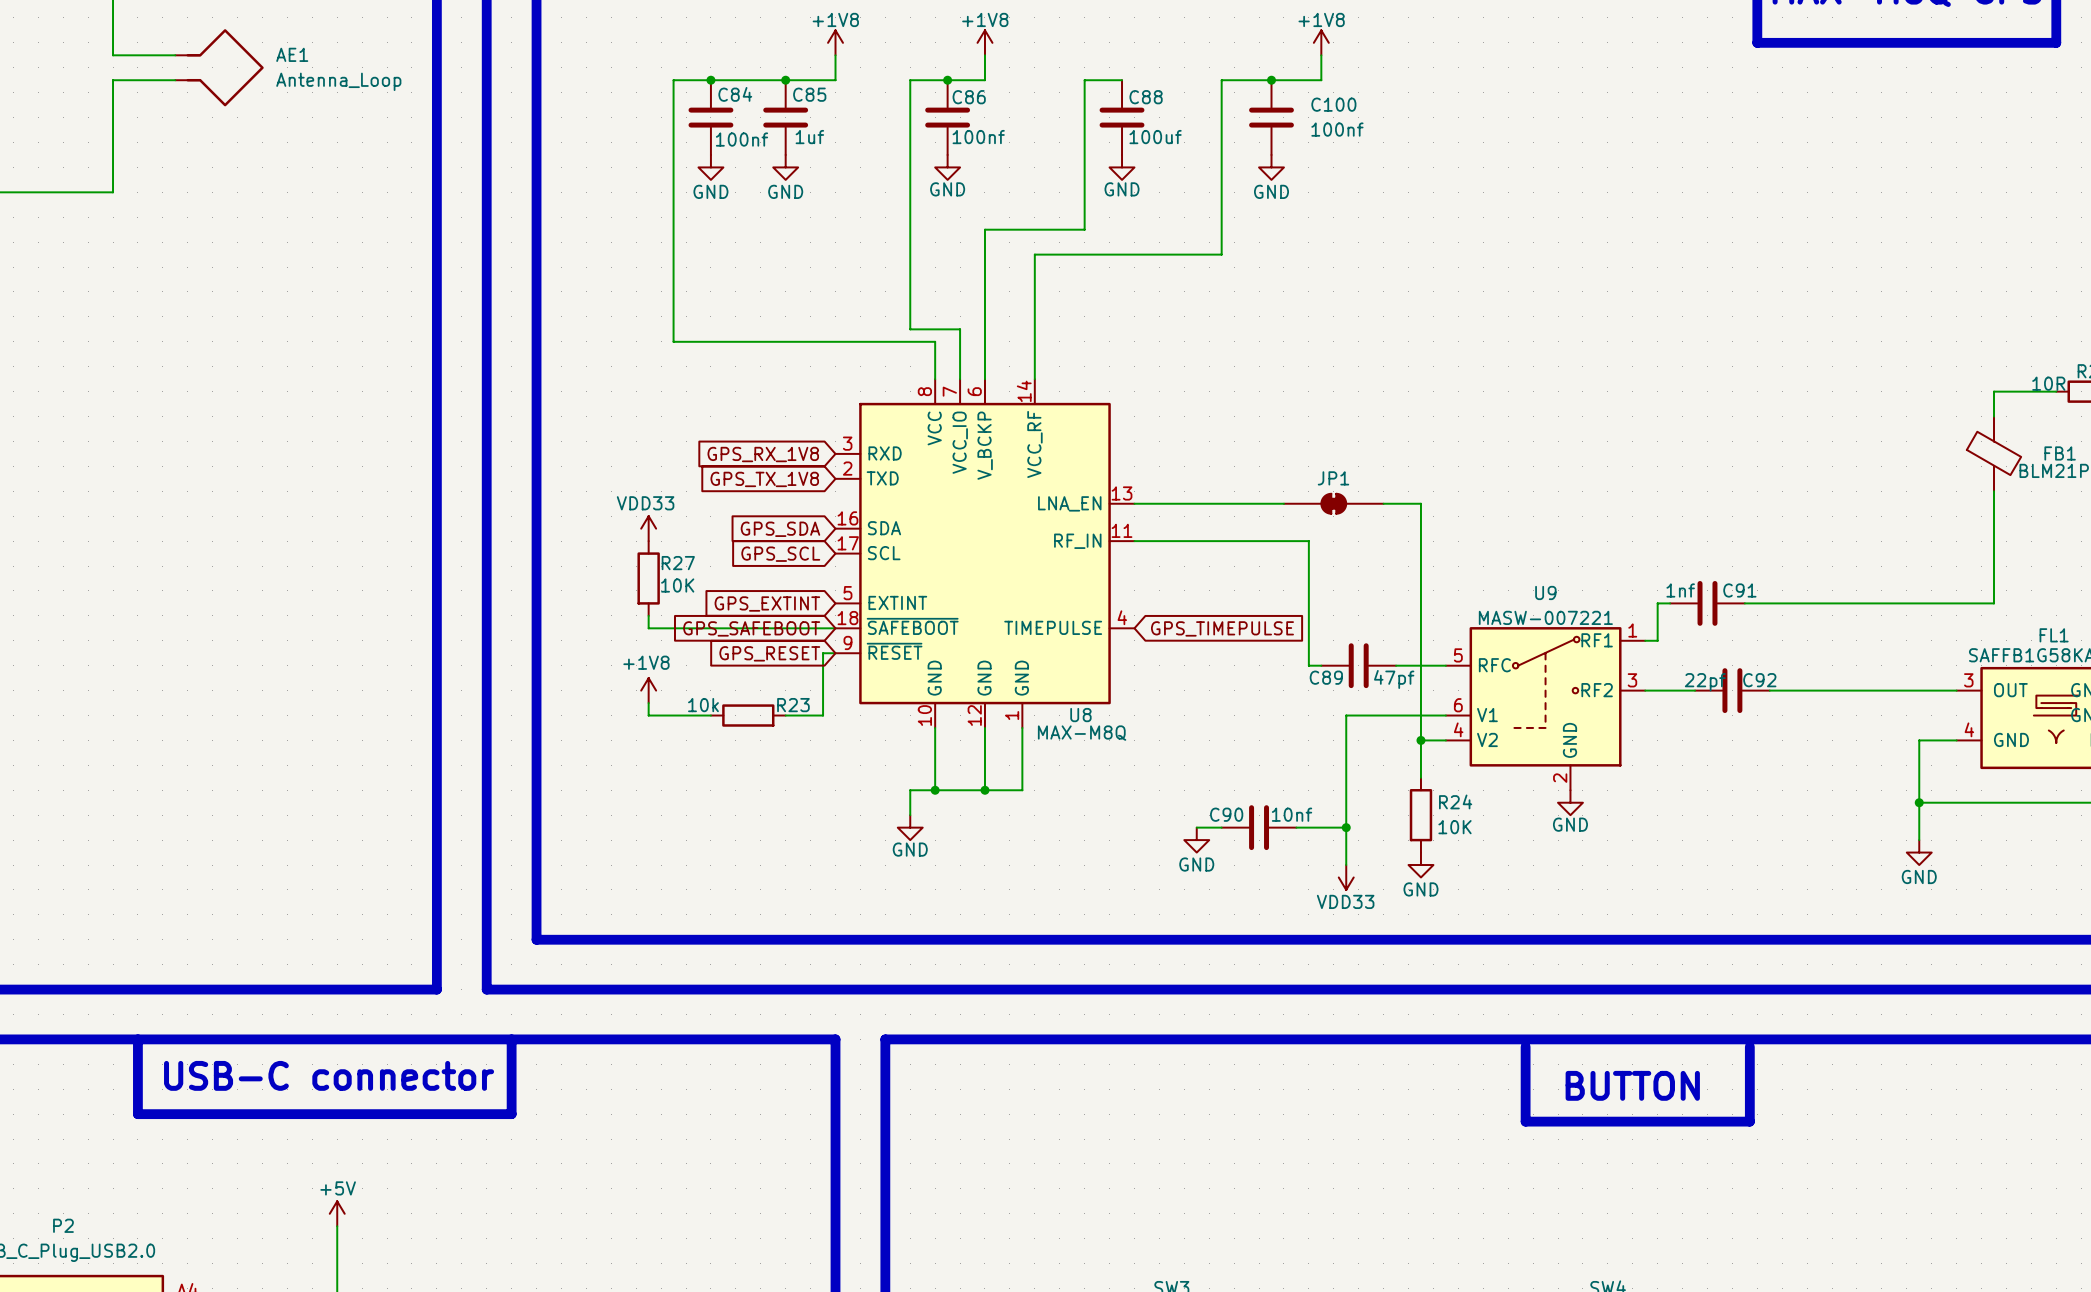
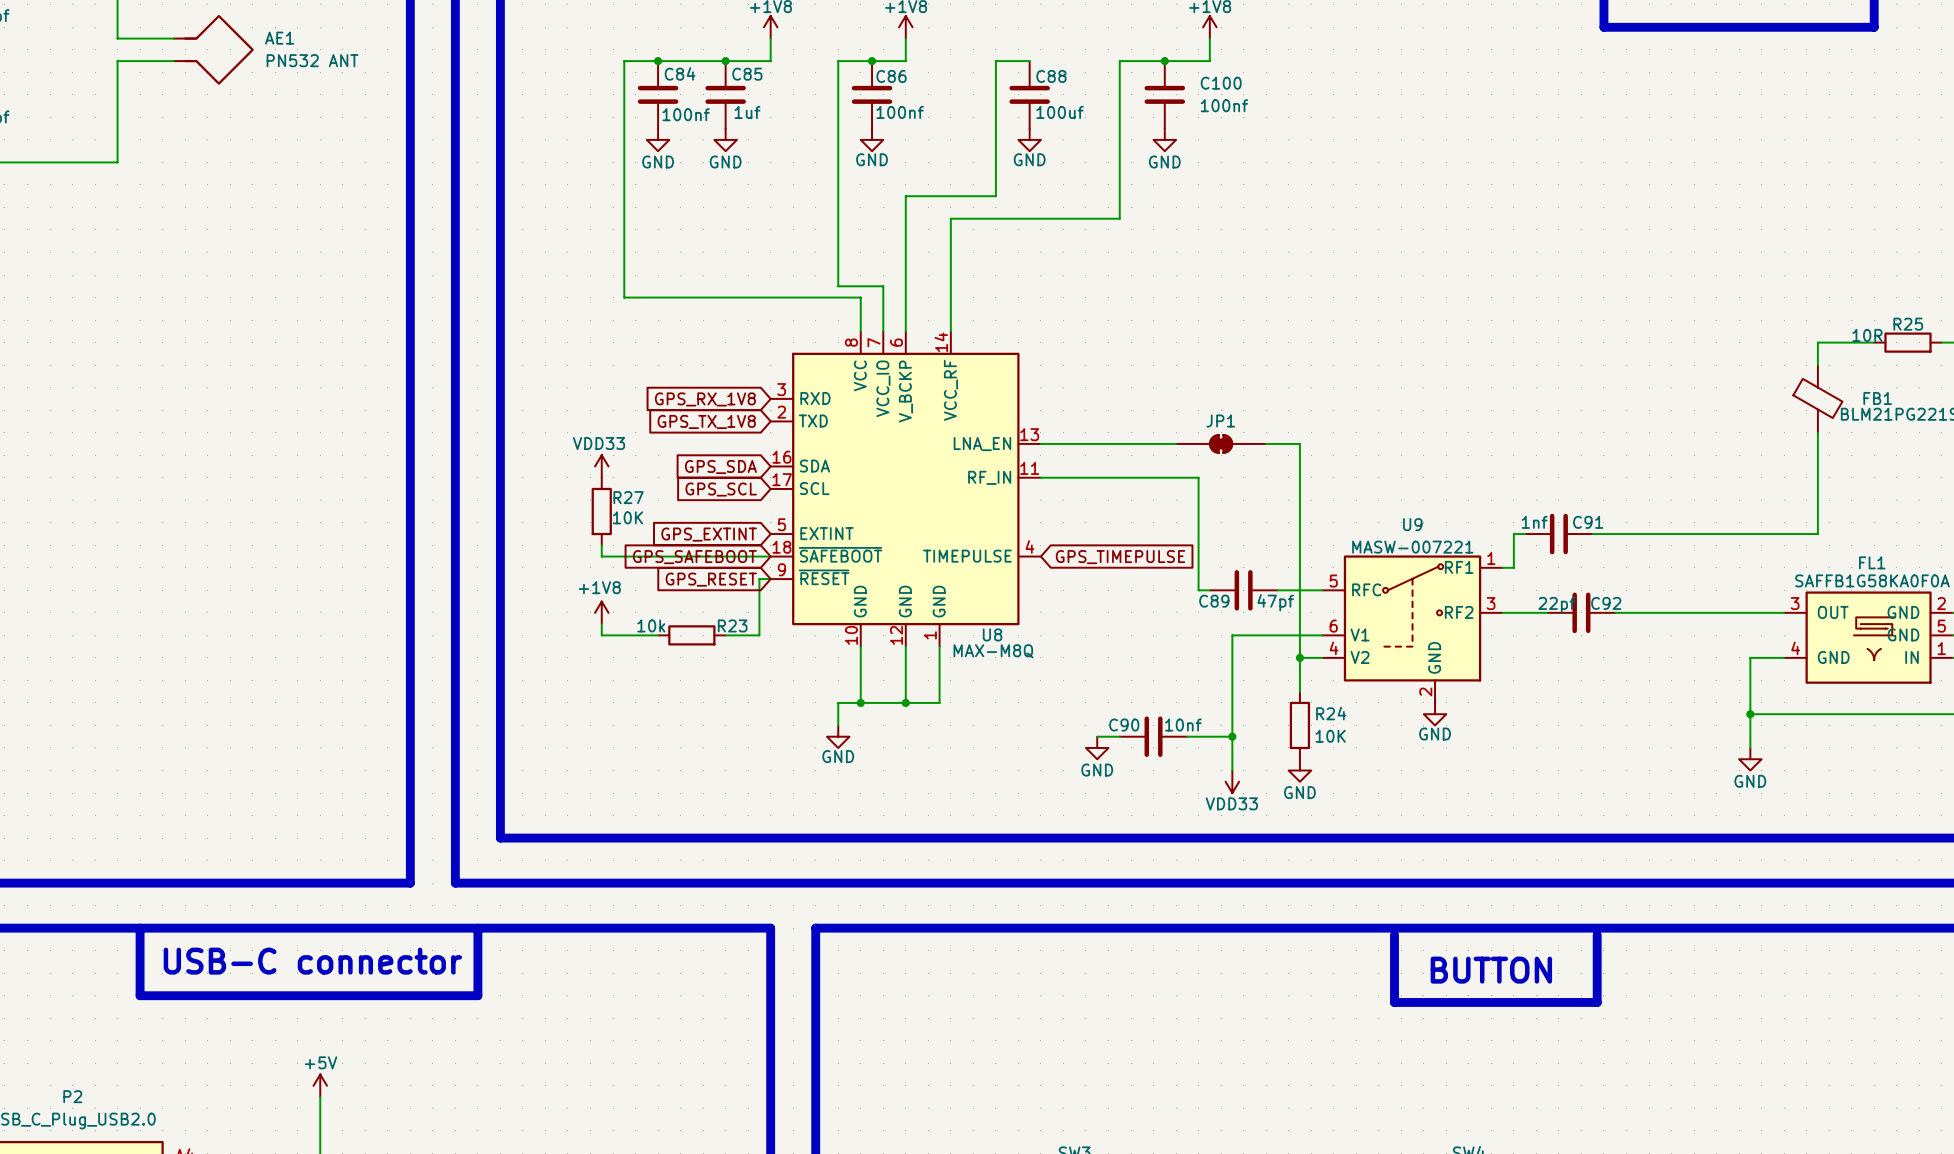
AE1 value: Antenna_Loop (338, 81) -> PN532 ANT (312, 60)

